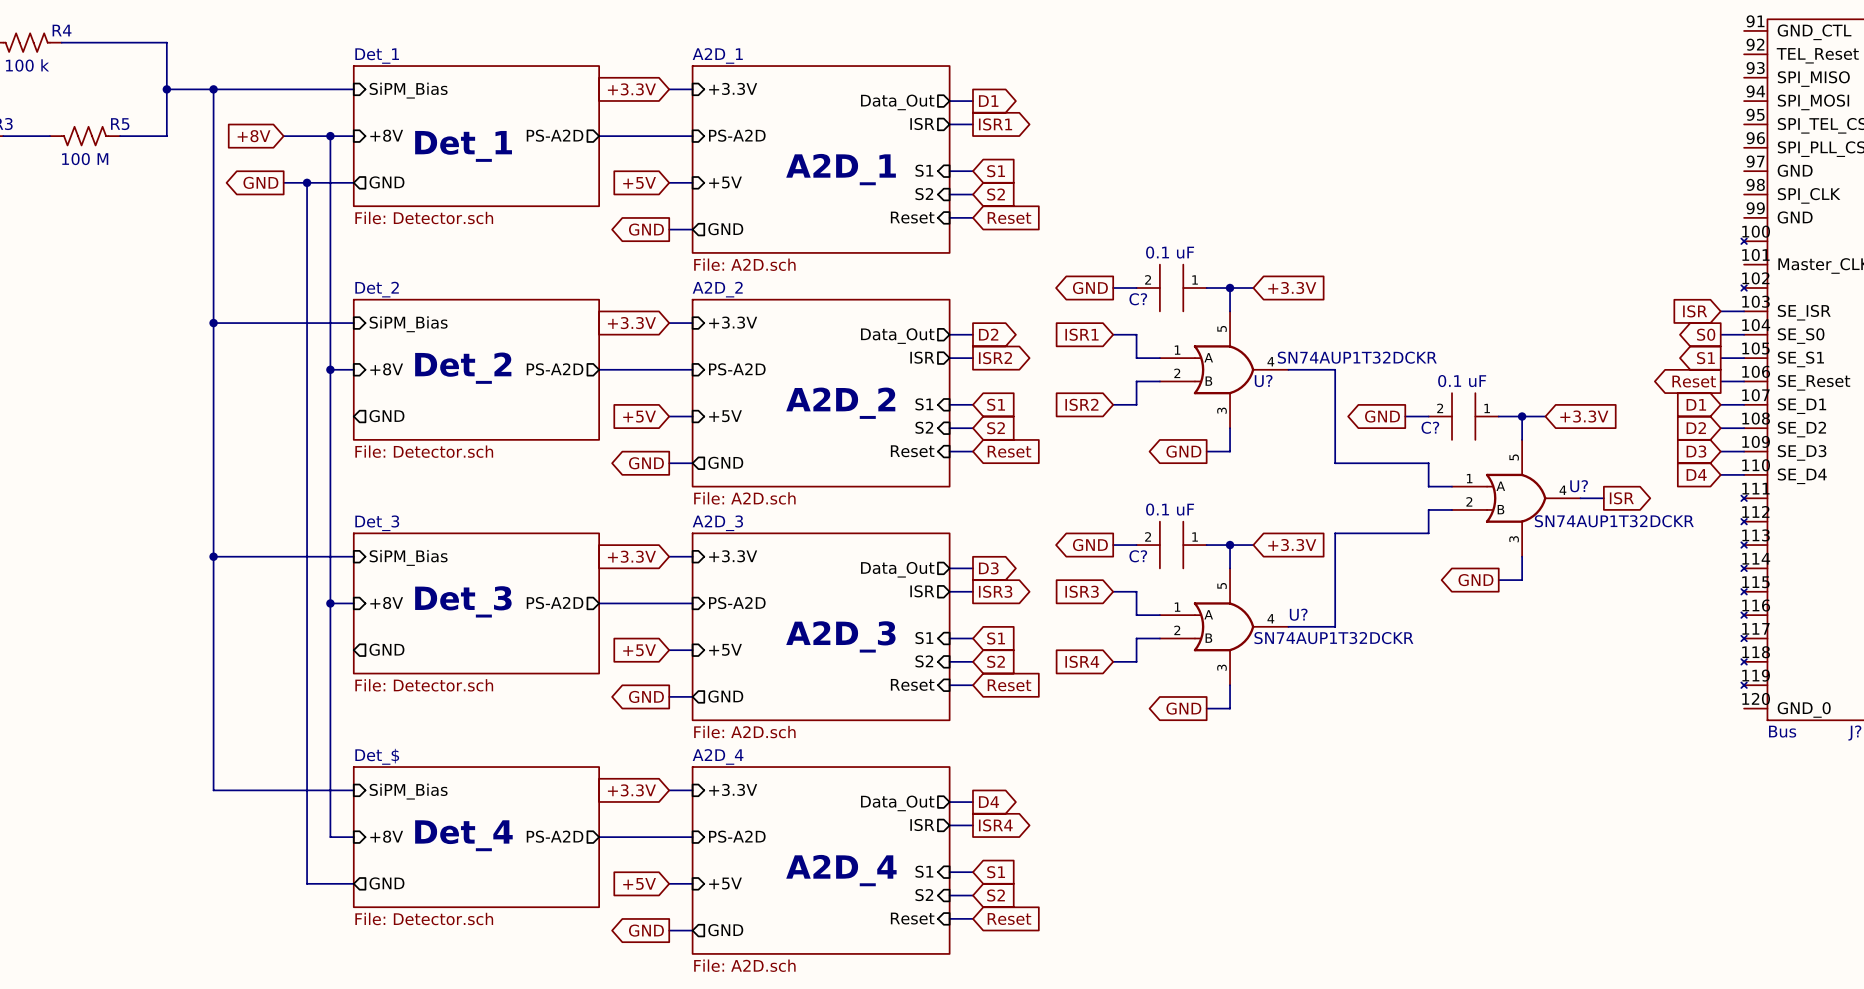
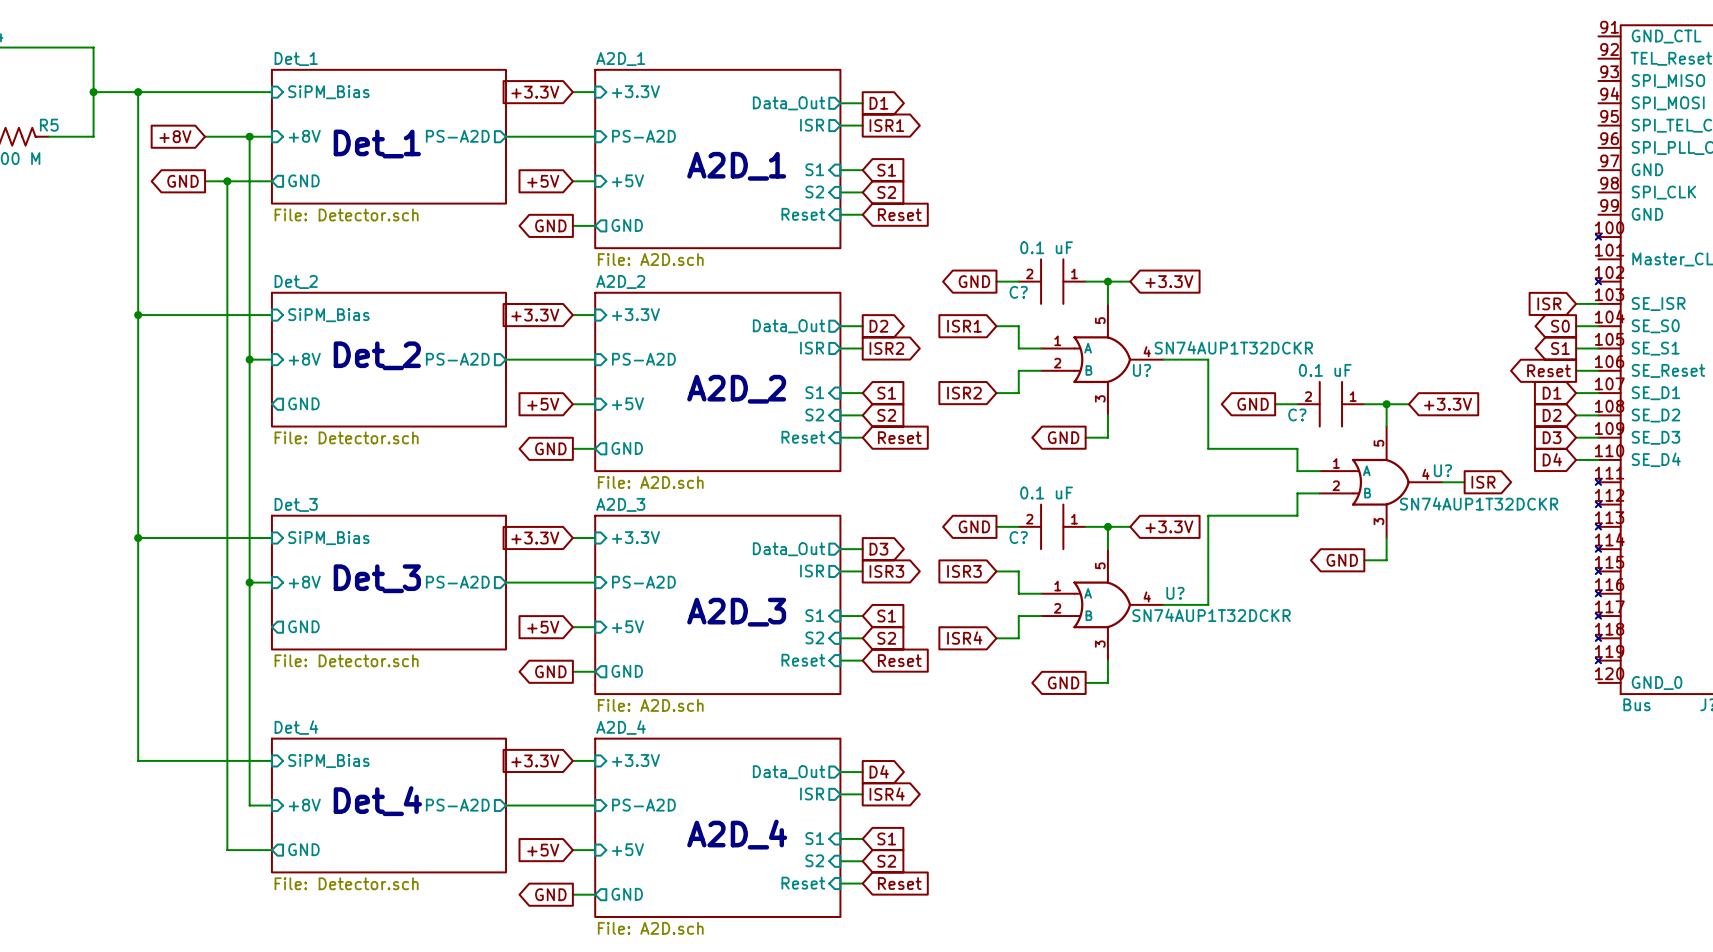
sheet Det_$ name: Det_$ (377, 756) -> Det_4 (296, 727)

